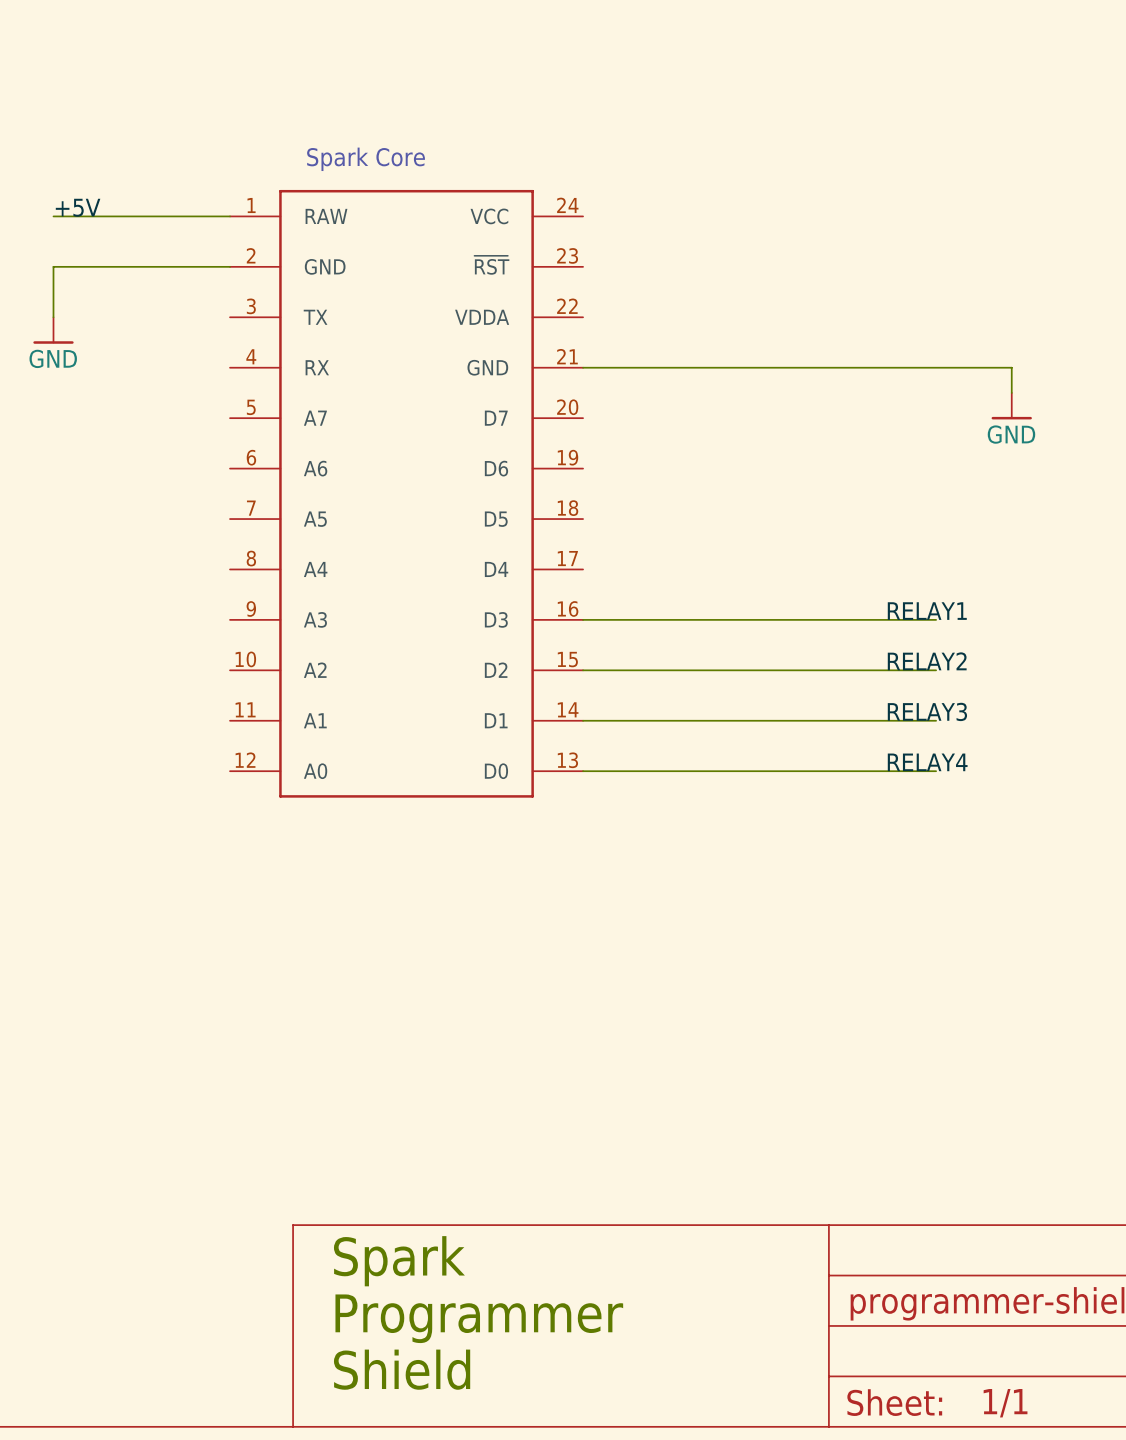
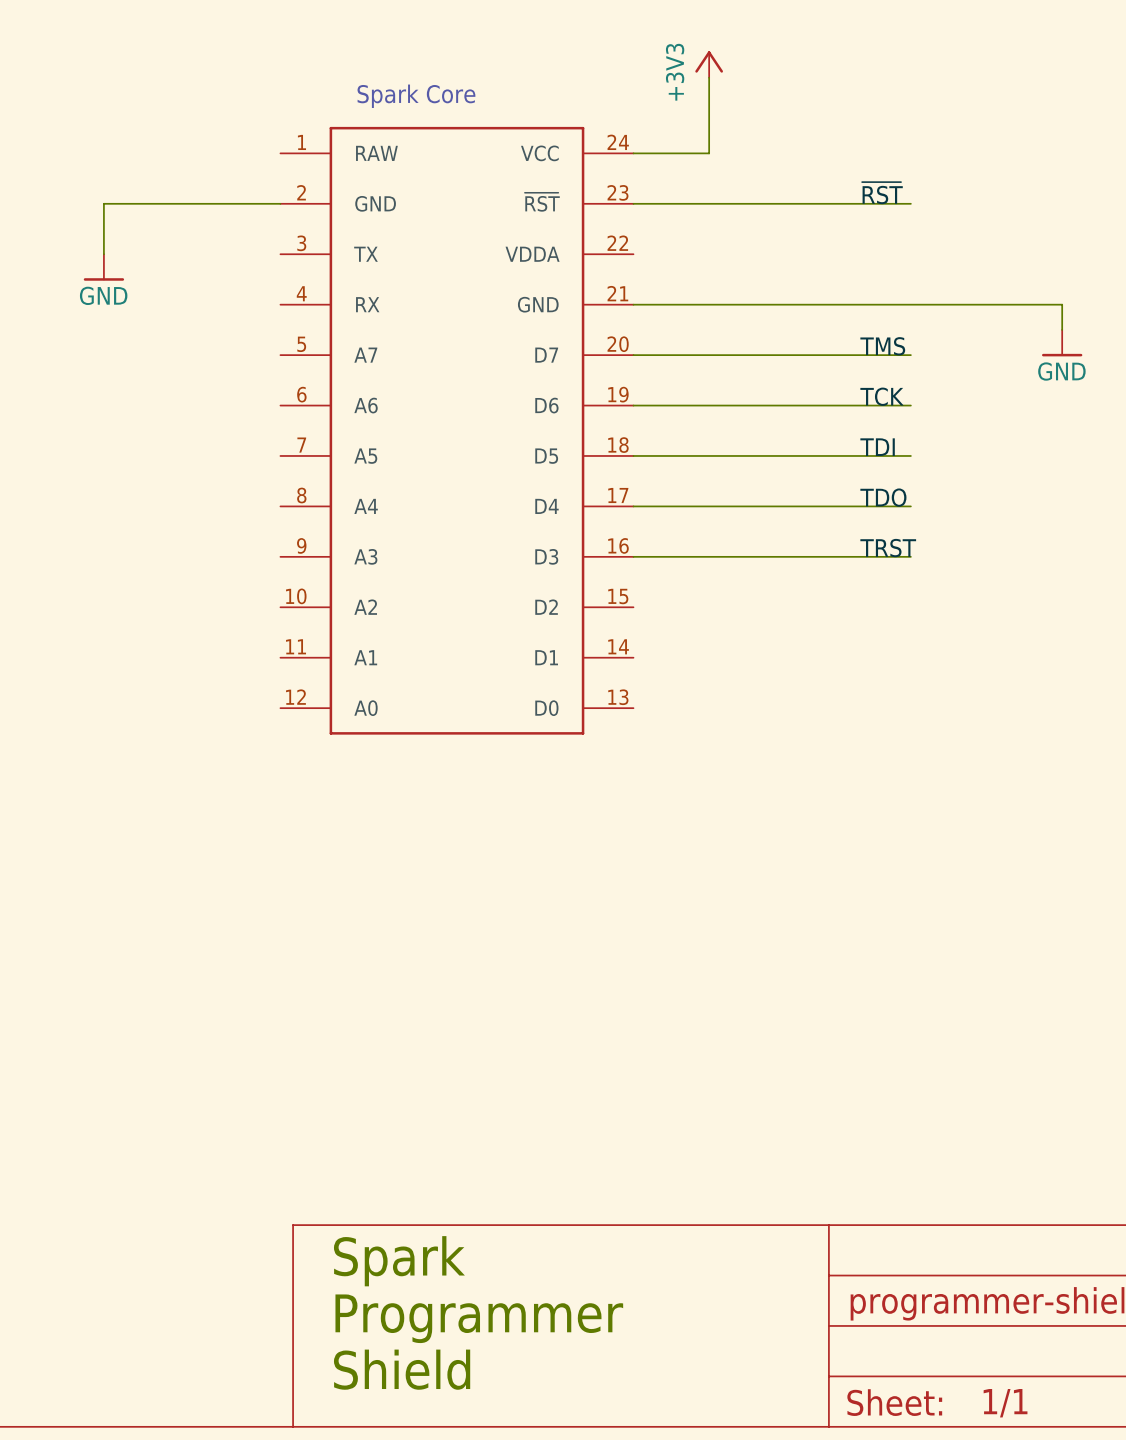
power symbol: none -> +3V3 (709, 64)
wire: none -> (709, 77) (709, 153) (633, 153)
text position: Spark Core (366, 159) -> Spark Core (416, 96)
label: none -> ~{RST} (882, 193)
wire: none -> (633, 203) (910, 203)
label: +5V (78, 207) -> none
wire: (53, 216) (230, 216) -> none
wire: (230, 266) (53, 266) (53, 317) -> (280, 203) (103, 203) (103, 254)
power symbol position: GND (53, 330) -> GND (103, 267)
label: none -> TMS (882, 346)
wire: none -> (633, 355) (910, 355)
wire: (583, 367) (1011, 367) (1011, 392) -> (633, 304) (1062, 304) (1062, 329)
label: none -> TCK (882, 396)
wire: none -> (633, 405) (910, 405)
power symbol position: GND (1011, 406) -> GND (1062, 343)
label: none -> TDI (877, 447)
wire: none -> (633, 455) (910, 455)
part position: (406, 493) -> (456, 430)
label: none -> TDO (883, 497)
wire: none -> (633, 506) (910, 506)
label: none -> TRST (888, 548)
wire: none -> (633, 556) (910, 556)
label: RELAY1 (927, 611) -> none
wire: (583, 619) (936, 619) -> none
label: RELAY2 (927, 661) -> none
wire: (583, 670) (936, 670) -> none
label: RELAY3 (927, 711) -> none
wire: (583, 720) (936, 720) -> none
label: RELAY4 (927, 762) -> none
wire: (583, 771) (936, 771) -> none

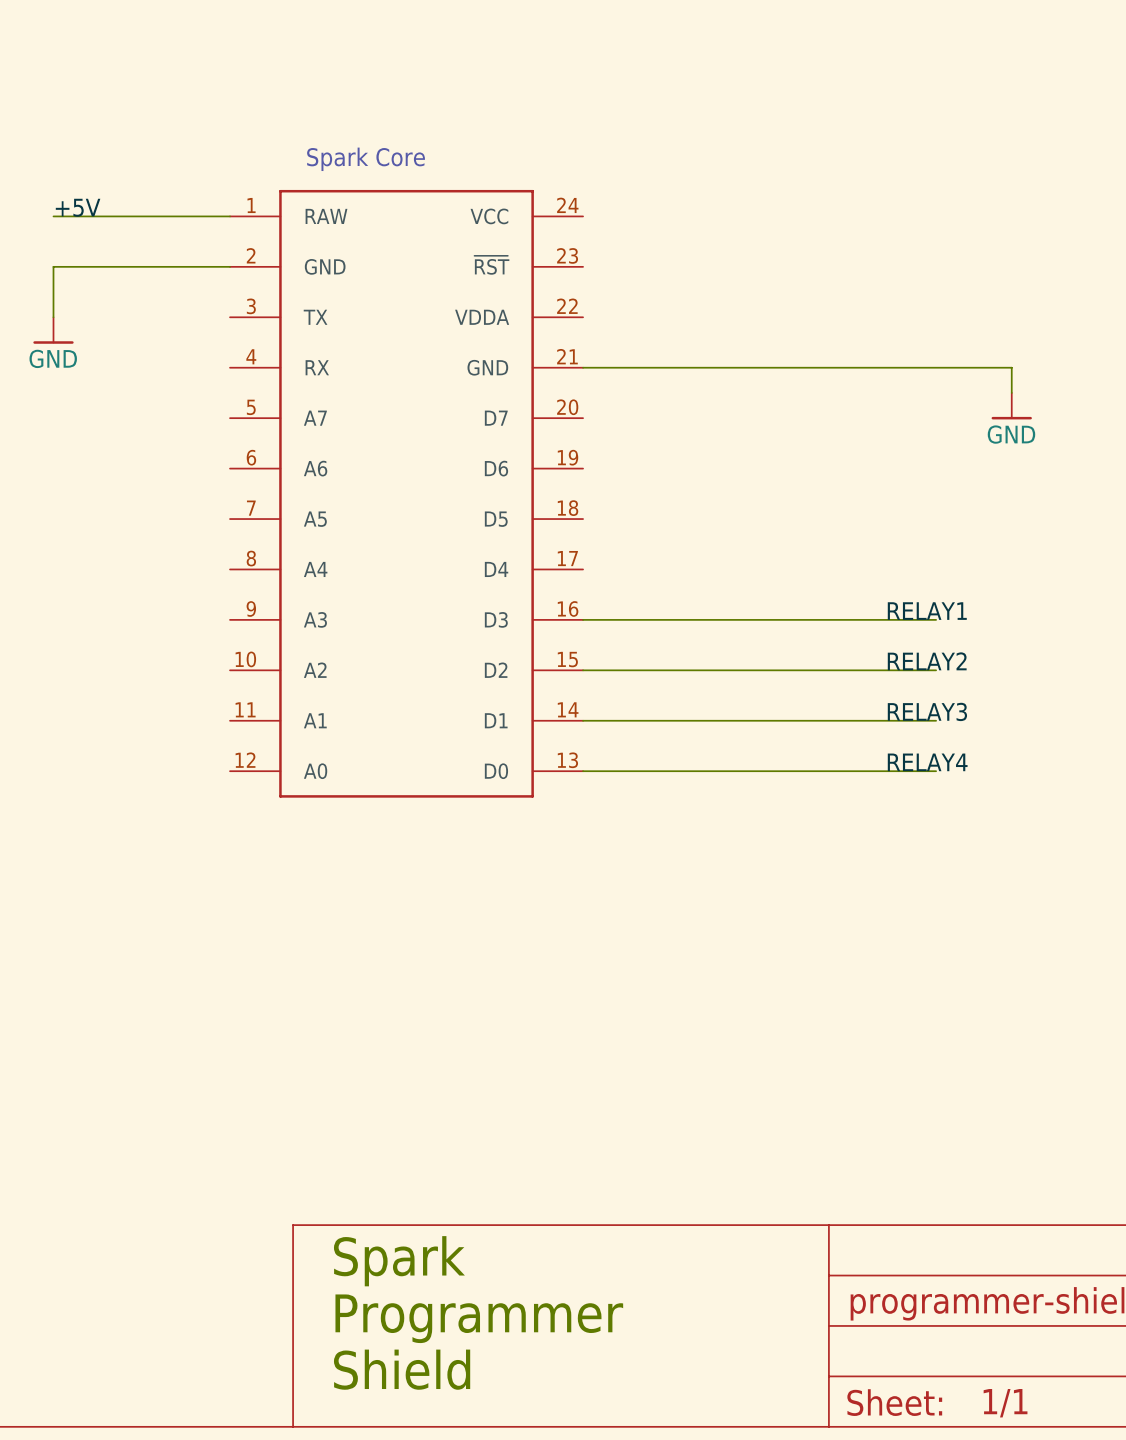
power symbol: +3V3 (709, 64) -> none
wire: (709, 77) (709, 153) (633, 153) -> none
text position: Spark Core (416, 96) -> Spark Core (366, 159)
label: ~{RST} (882, 193) -> none
wire: (280, 203) (103, 203) (103, 254) -> (230, 266) (53, 266) (53, 317)
wire: (633, 203) (910, 203) -> none
label: none -> +5V (78, 207)
wire: none -> (53, 216) (230, 216)
power symbol position: GND (103, 267) -> GND (53, 330)
wire: (633, 304) (1062, 304) (1062, 329) -> (583, 367) (1011, 367) (1011, 392)
power symbol position: GND (1062, 343) -> GND (1011, 406)
label: TMS (882, 346) -> none
wire: (633, 355) (910, 355) -> none
label: TCK (882, 396) -> none
wire: (633, 405) (910, 405) -> none
part position: (456, 430) -> (406, 493)
label: TDI (877, 447) -> none
wire: (633, 455) (910, 455) -> none
label: TDO (883, 497) -> none
wire: (633, 506) (910, 506) -> none
label: TRST (888, 548) -> none
wire: (633, 556) (910, 556) -> none
label: none -> RELAY1 (927, 611)
wire: none -> (583, 619) (936, 619)
label: none -> RELAY2 (927, 661)
wire: none -> (583, 670) (936, 670)
label: none -> RELAY3 (927, 711)
wire: none -> (583, 720) (936, 720)
label: none -> RELAY4 (927, 762)
wire: none -> (583, 771) (936, 771)

